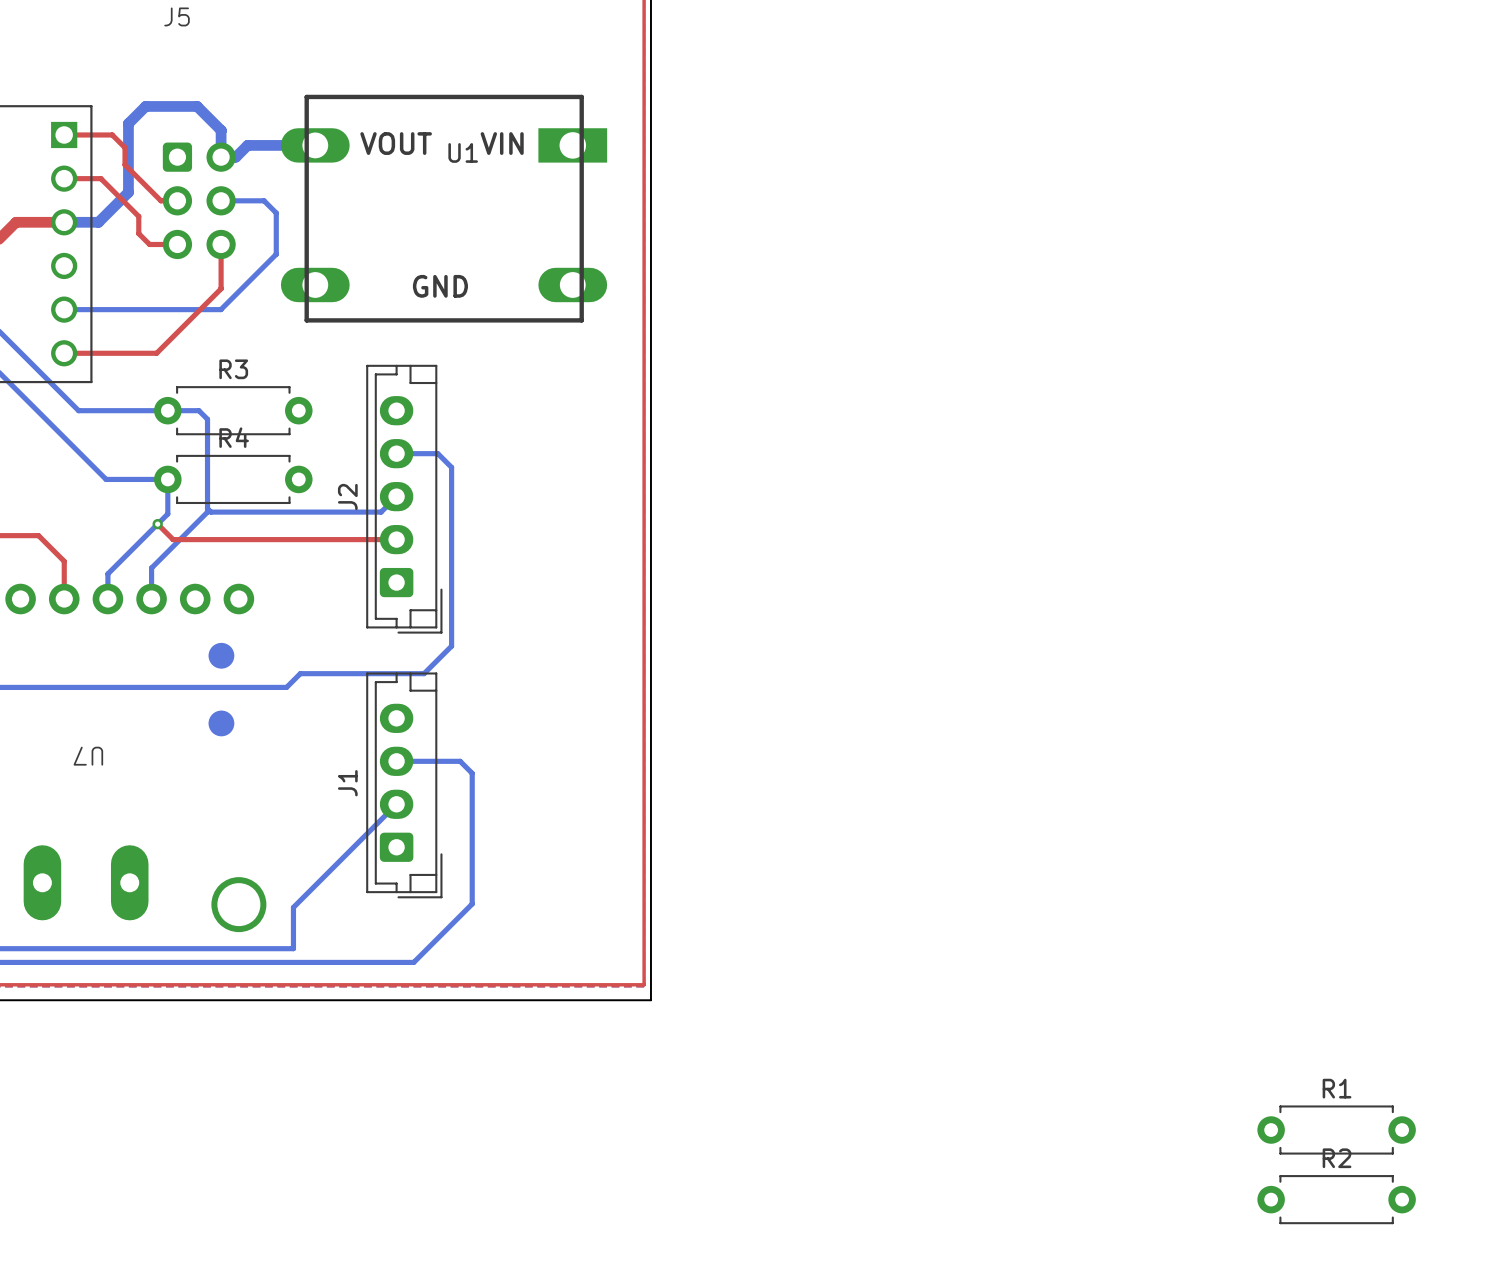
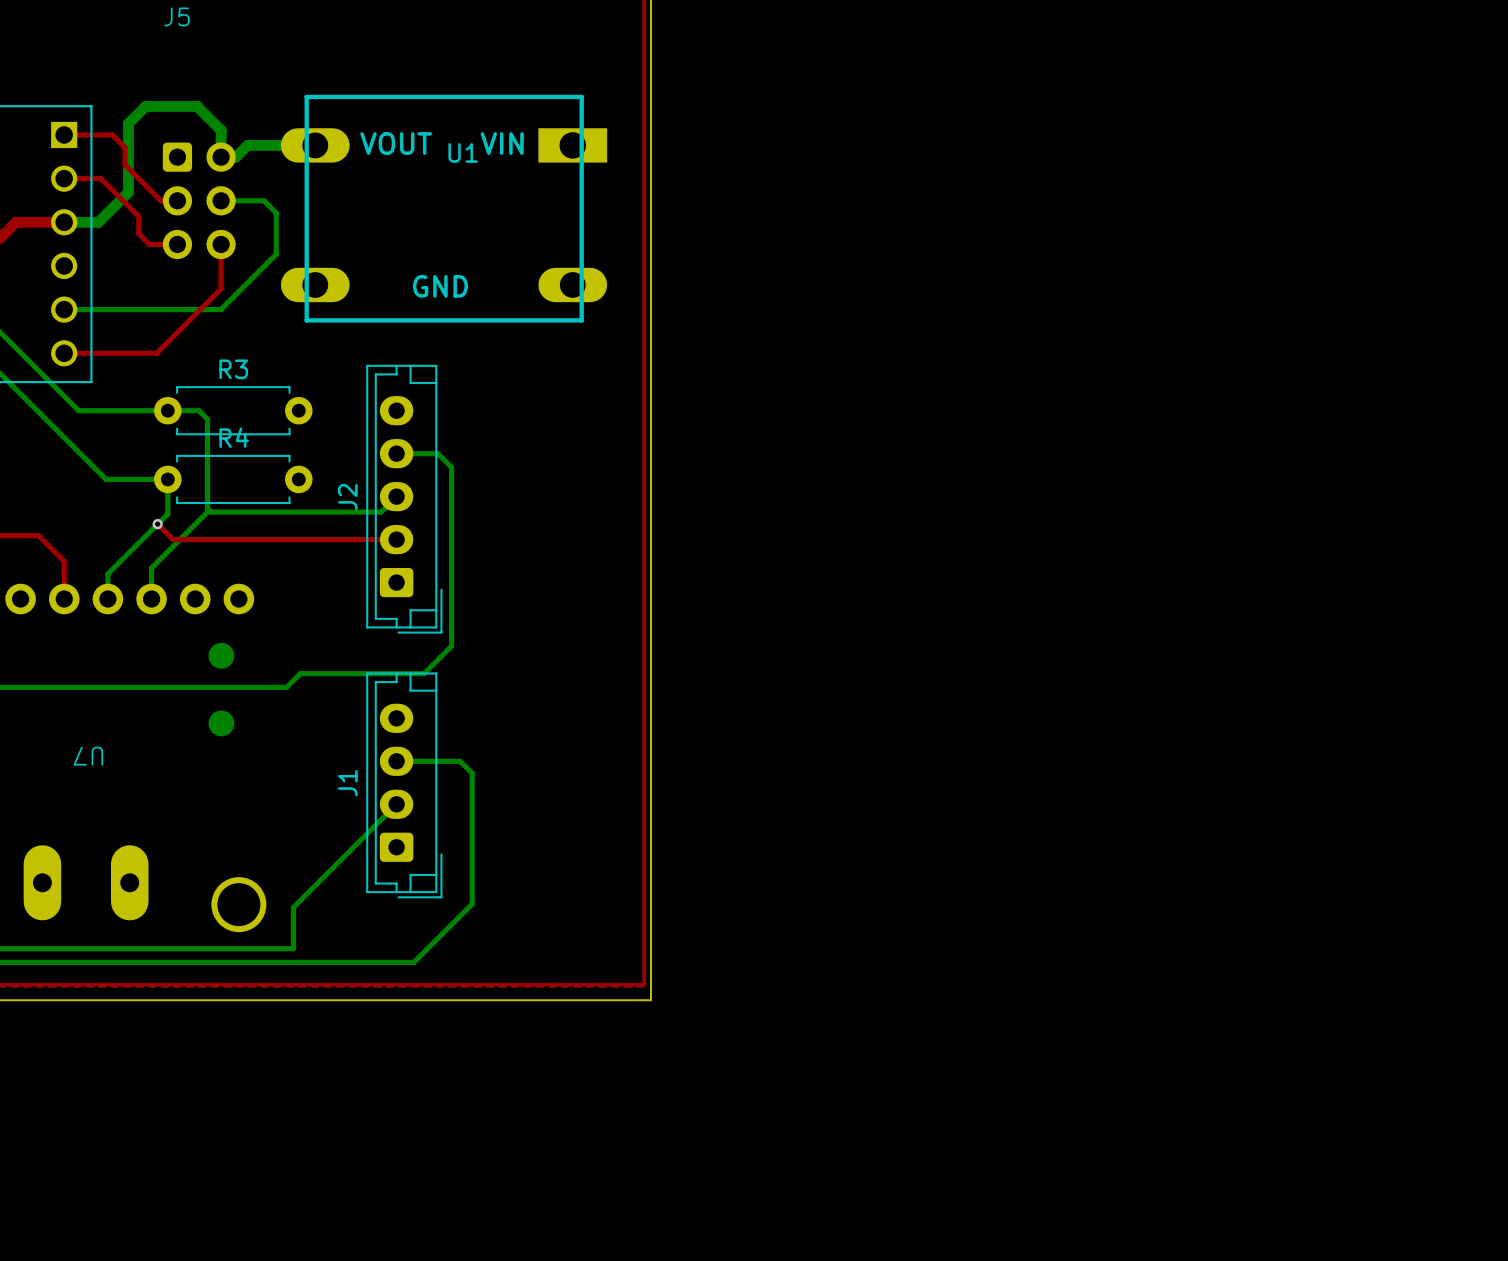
R1: (1336, 1130) -> none
R2: (1336, 1199) -> none

